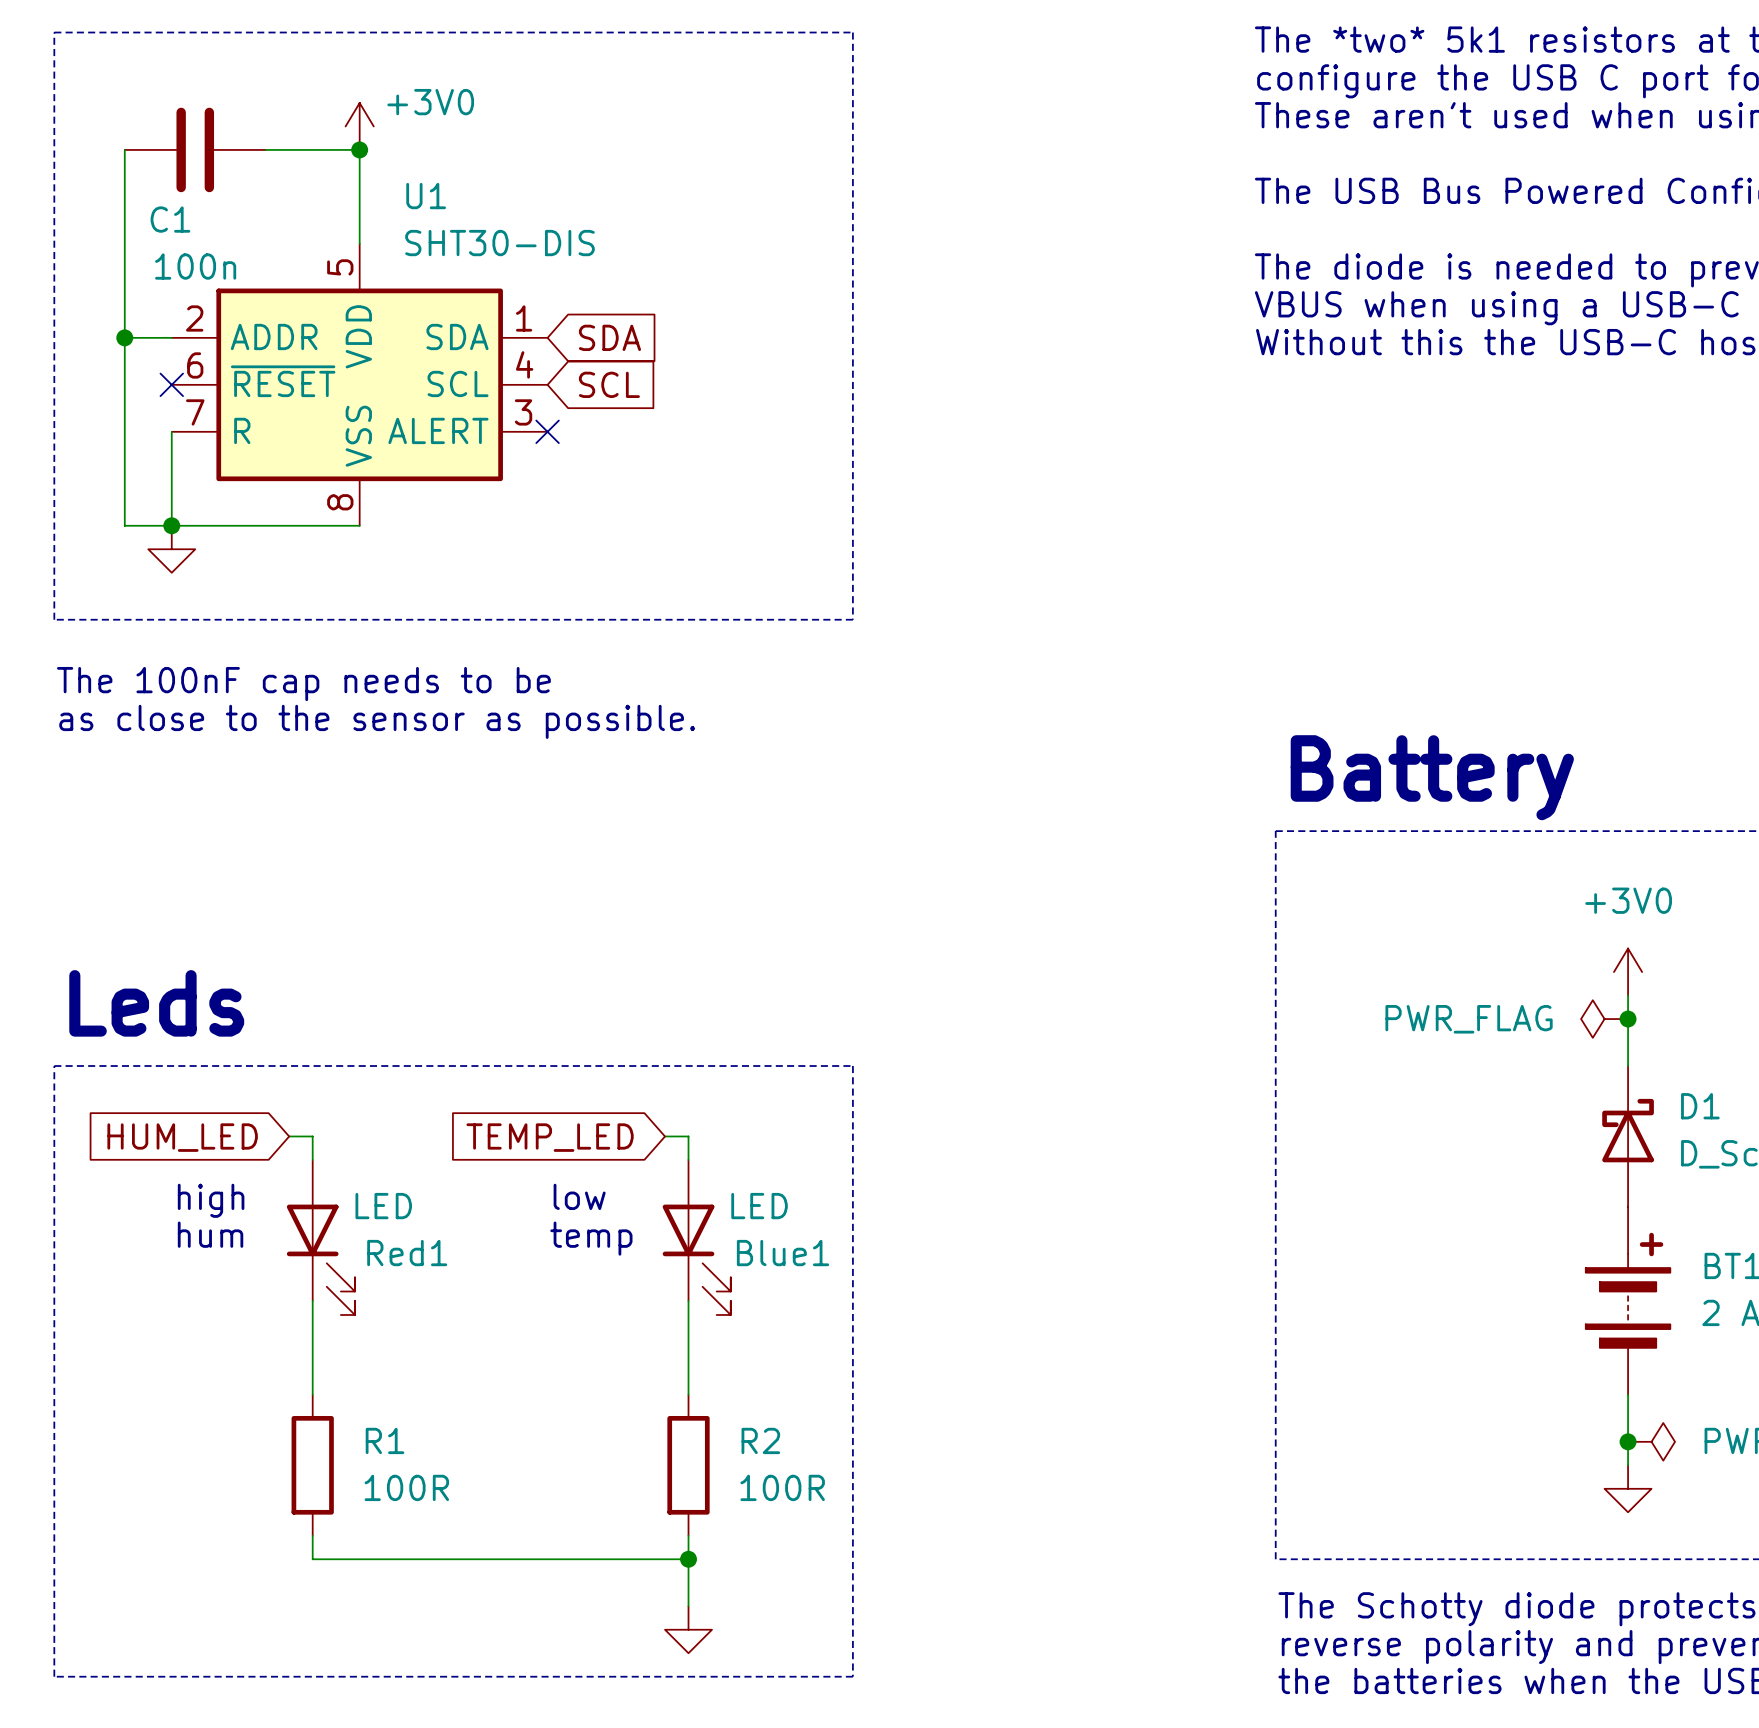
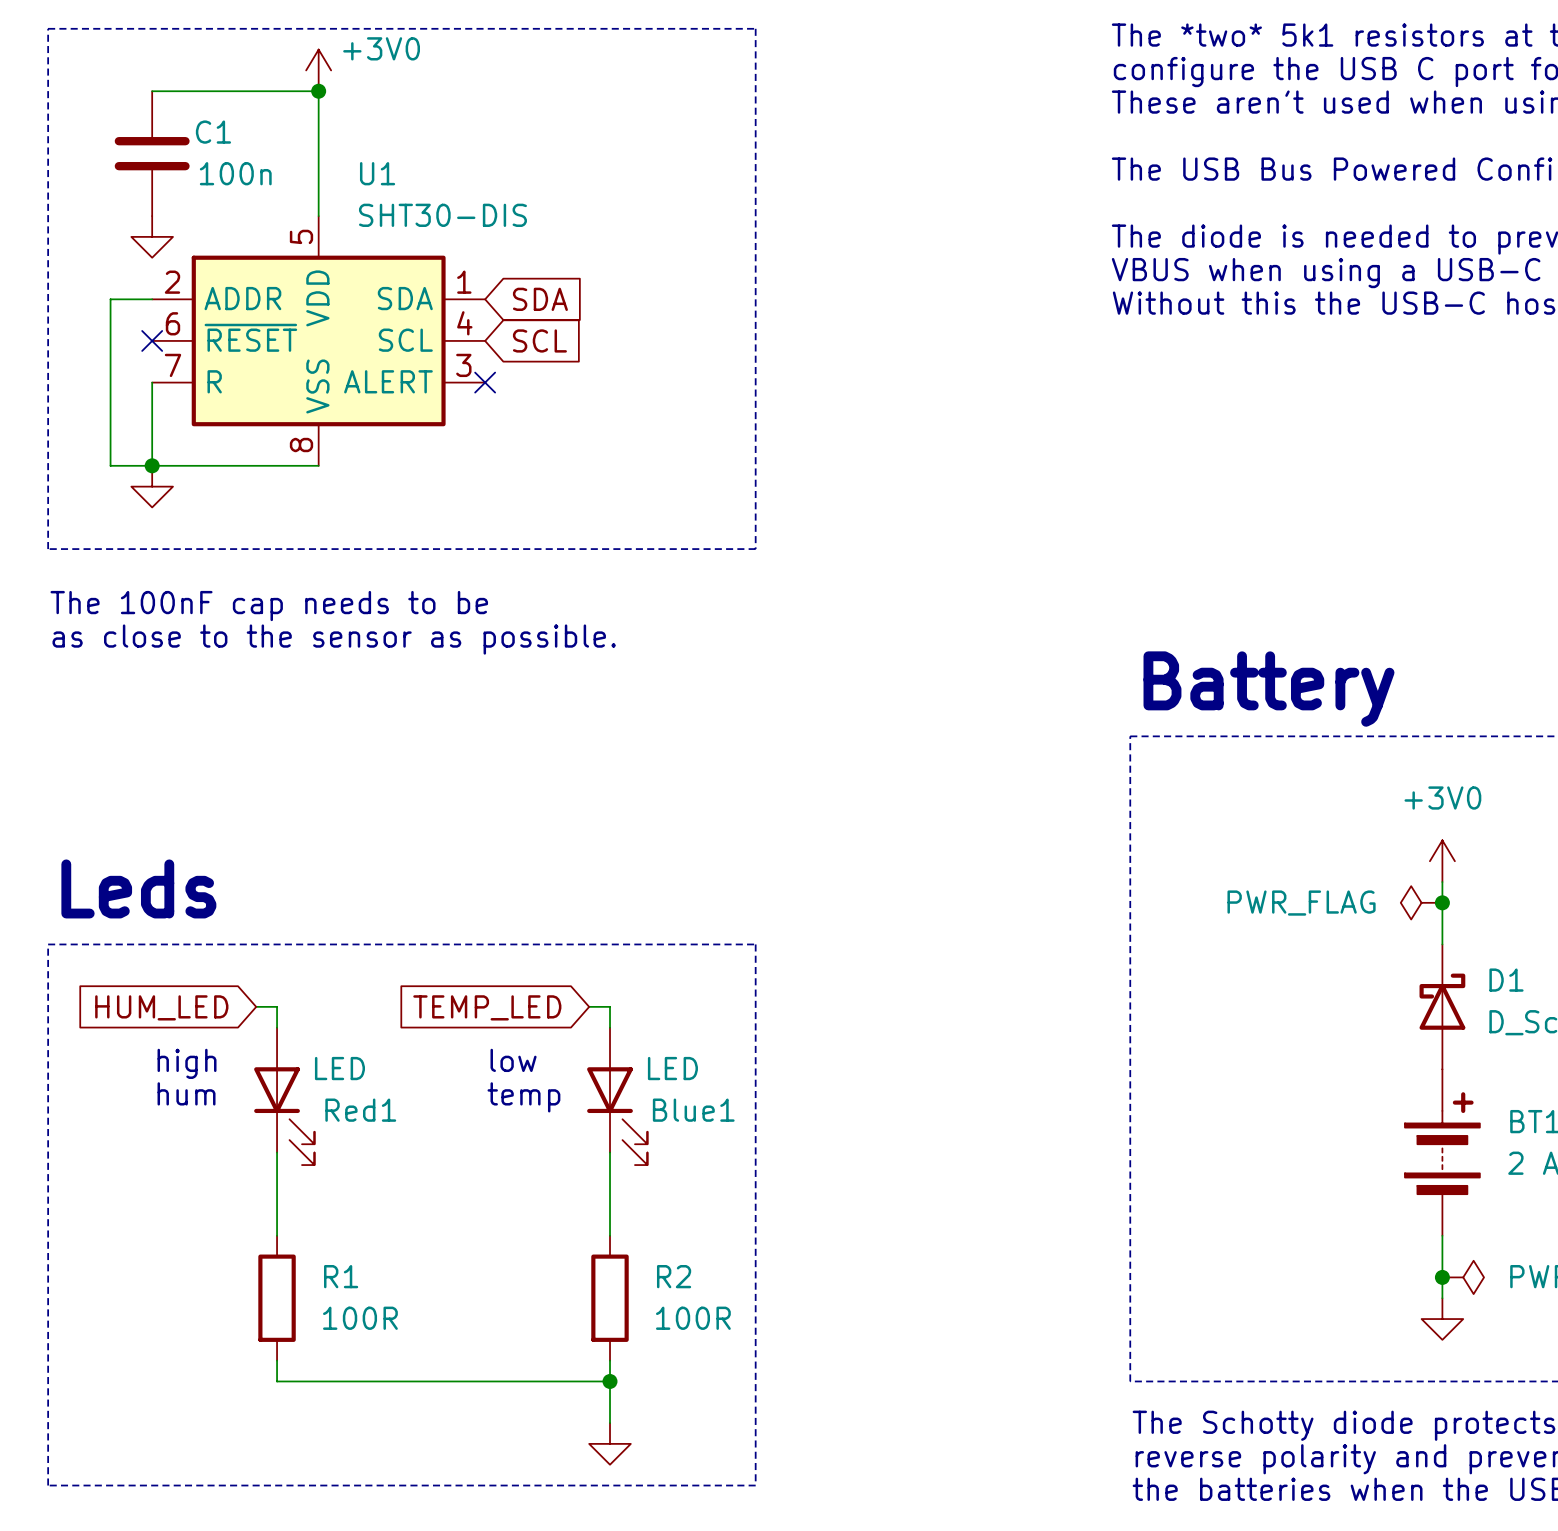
power symbol position: +3V0 (359, 126) -> +3V0 (318, 70)
wire: (124, 149) (124, 337) -> none
C1 rotation: 0° (195, 149) -> 90° clockwise (152, 153)
wire: (265, 149) (359, 149) -> (152, 91) (318, 91) (318, 132)
junction position: (359, 149) -> (318, 91)
C1 name position: C1 (170, 219) -> C1 (213, 132)
C1 value position: 100n (195, 266) -> 100n (235, 173)
power symbol: none -> (152, 236)
junction: (124, 337) -> none

